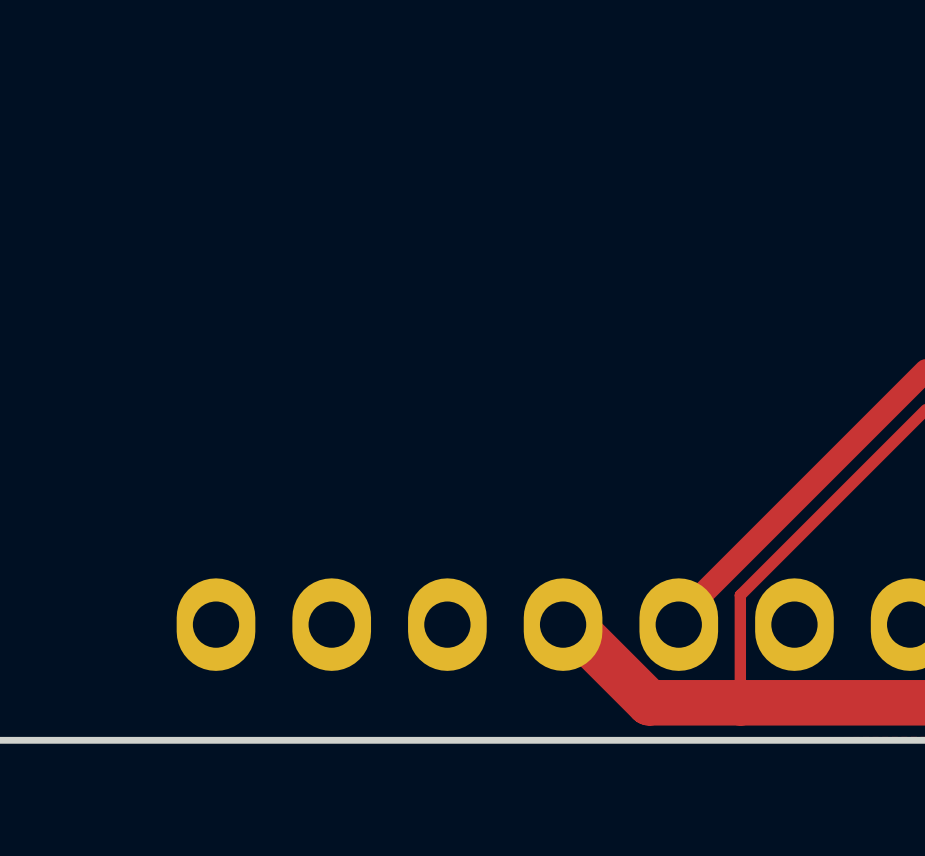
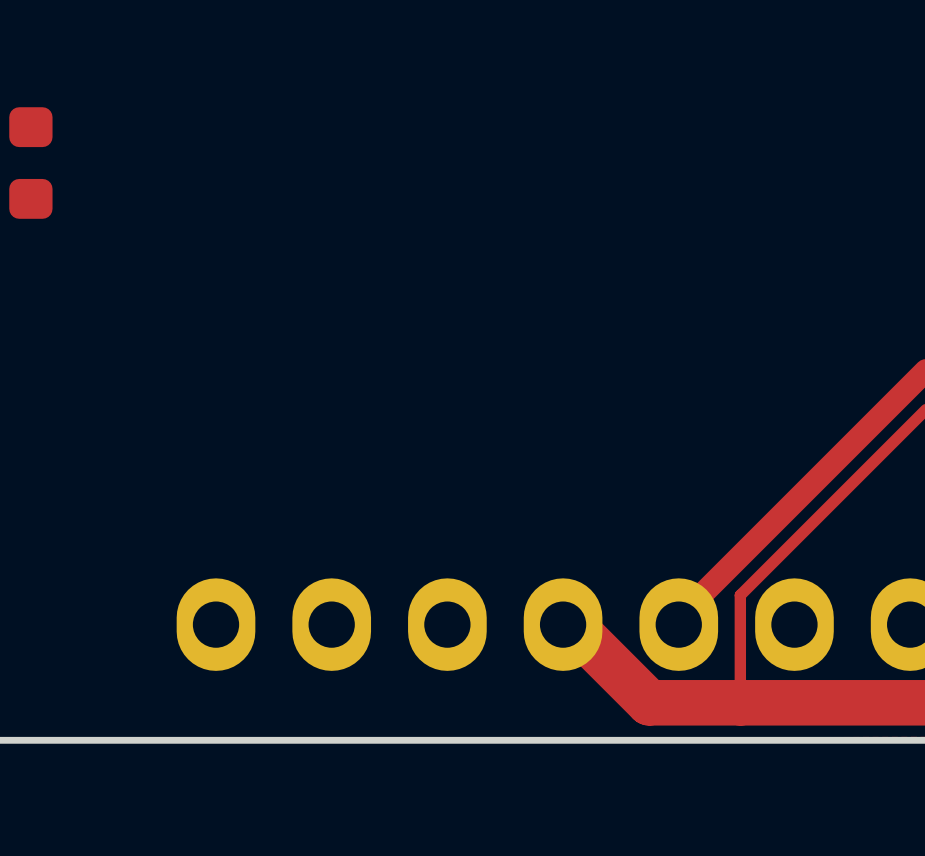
part: none -> (30, 163)

